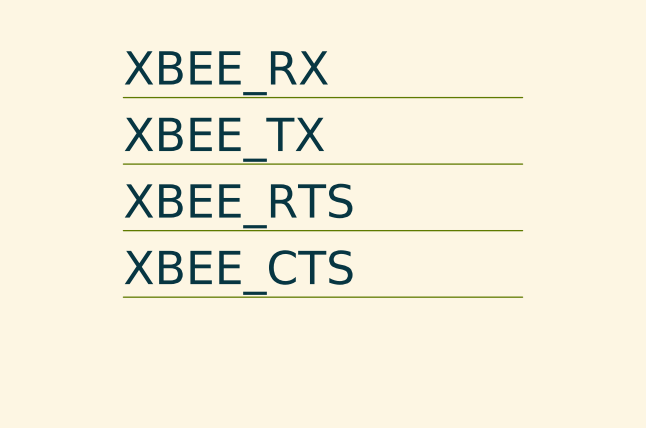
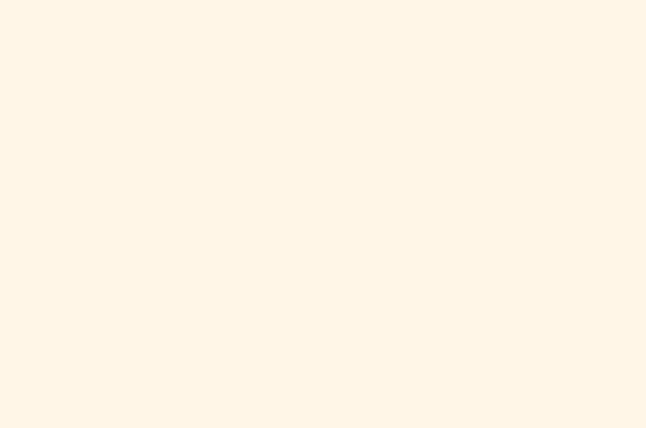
label: XBEE_RX (226, 73) -> none
wire: (123, 97) (522, 97) -> none
label: XBEE_TX (224, 139) -> none
wire: (123, 164) (522, 164) -> none
label: XBEE_RTS (238, 206) -> none
wire: (123, 230) (522, 230) -> none
label: XBEE_CTS (238, 272) -> none
wire: (123, 297) (522, 297) -> none

